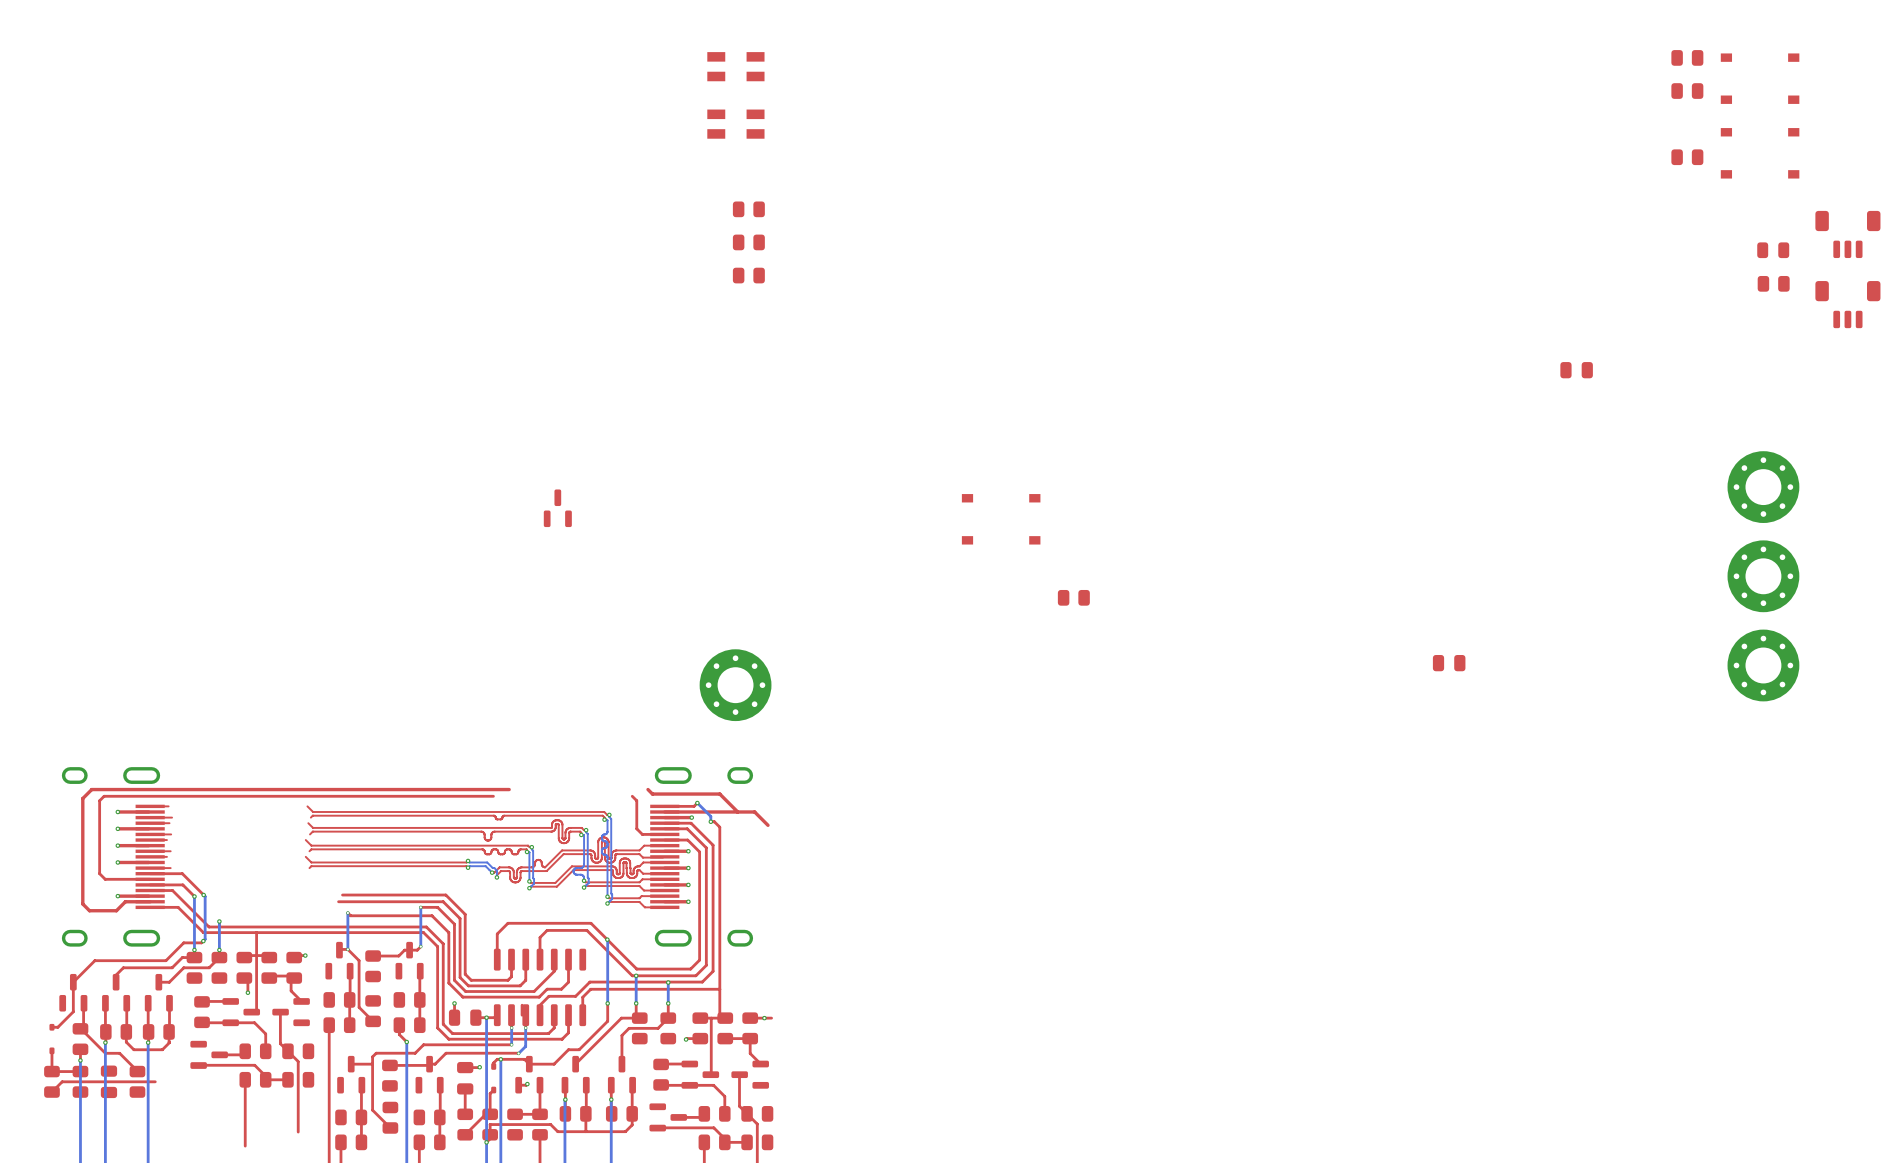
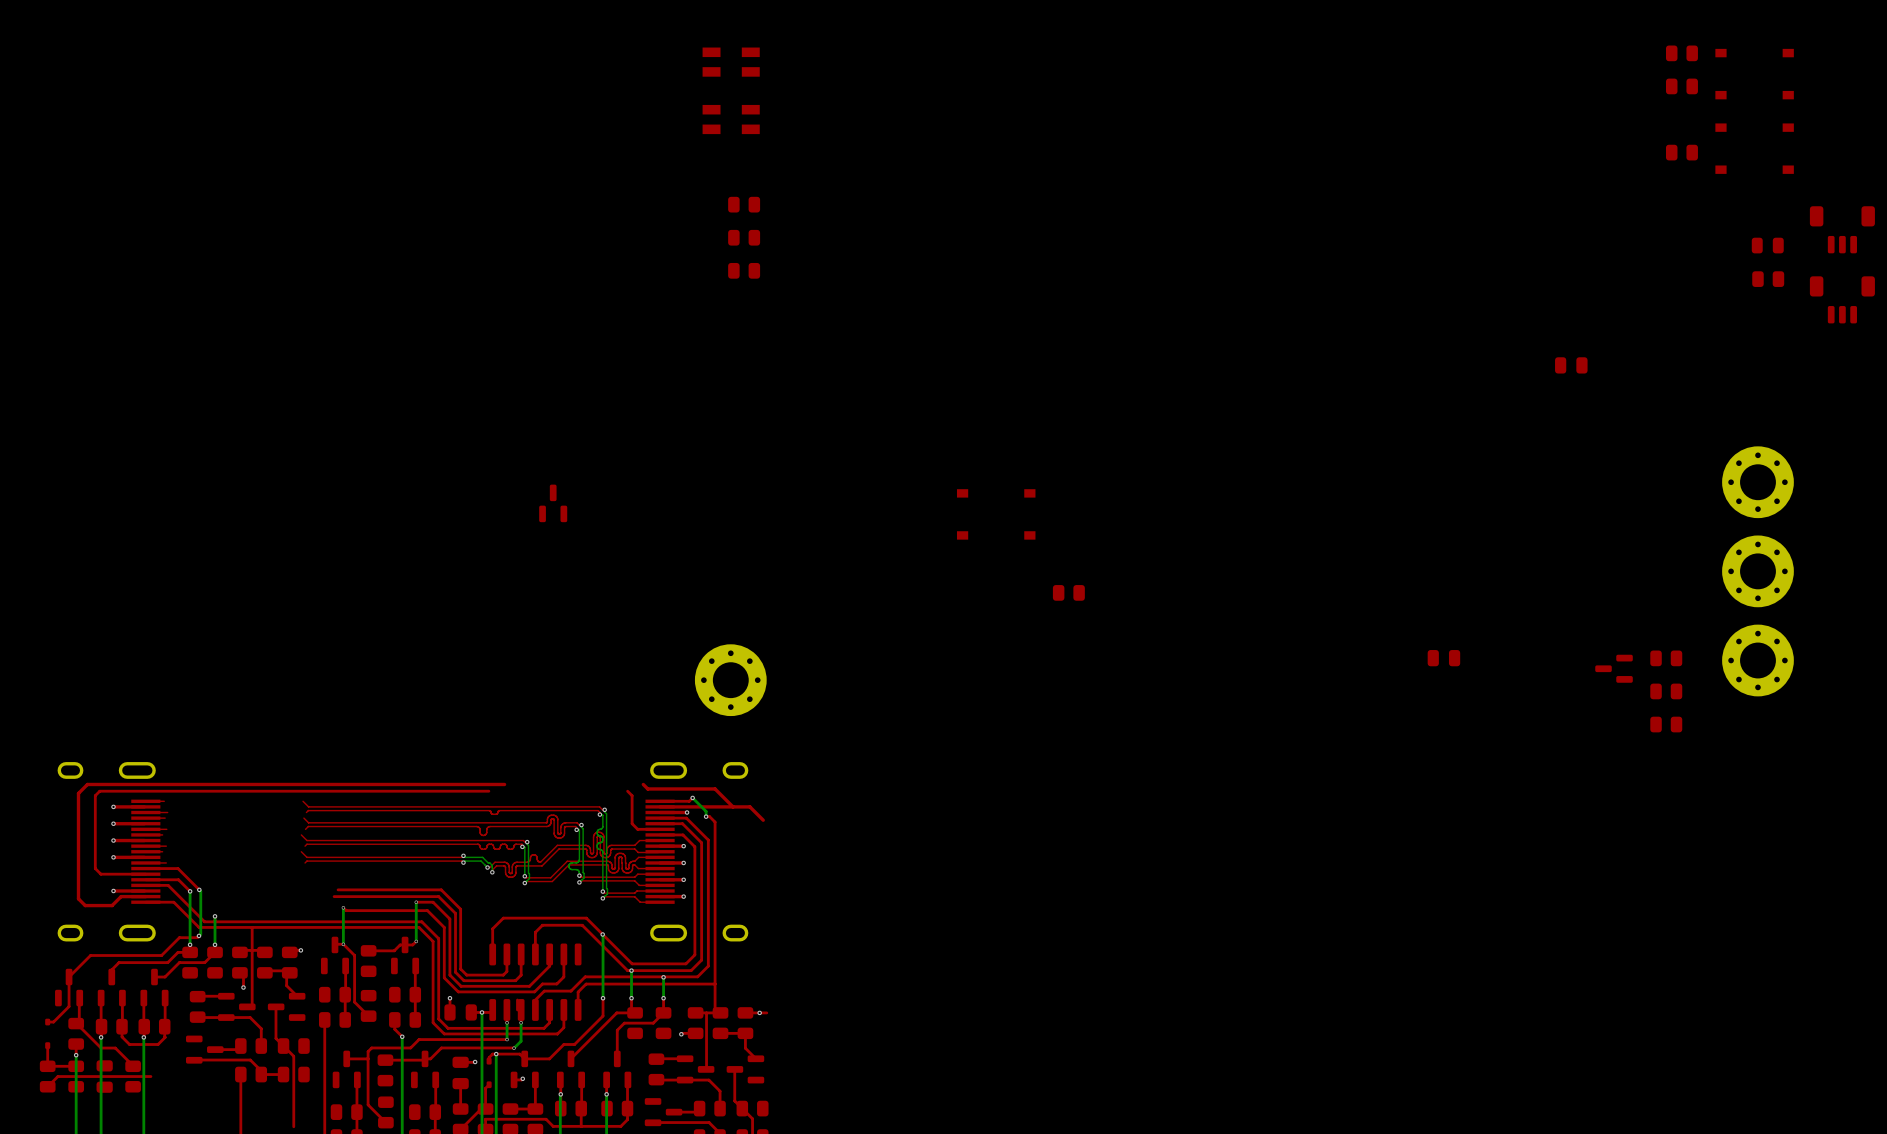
part: none -> (1666, 658)
part: none -> (1614, 668)
part: none -> (1666, 691)
part: none -> (1666, 724)

